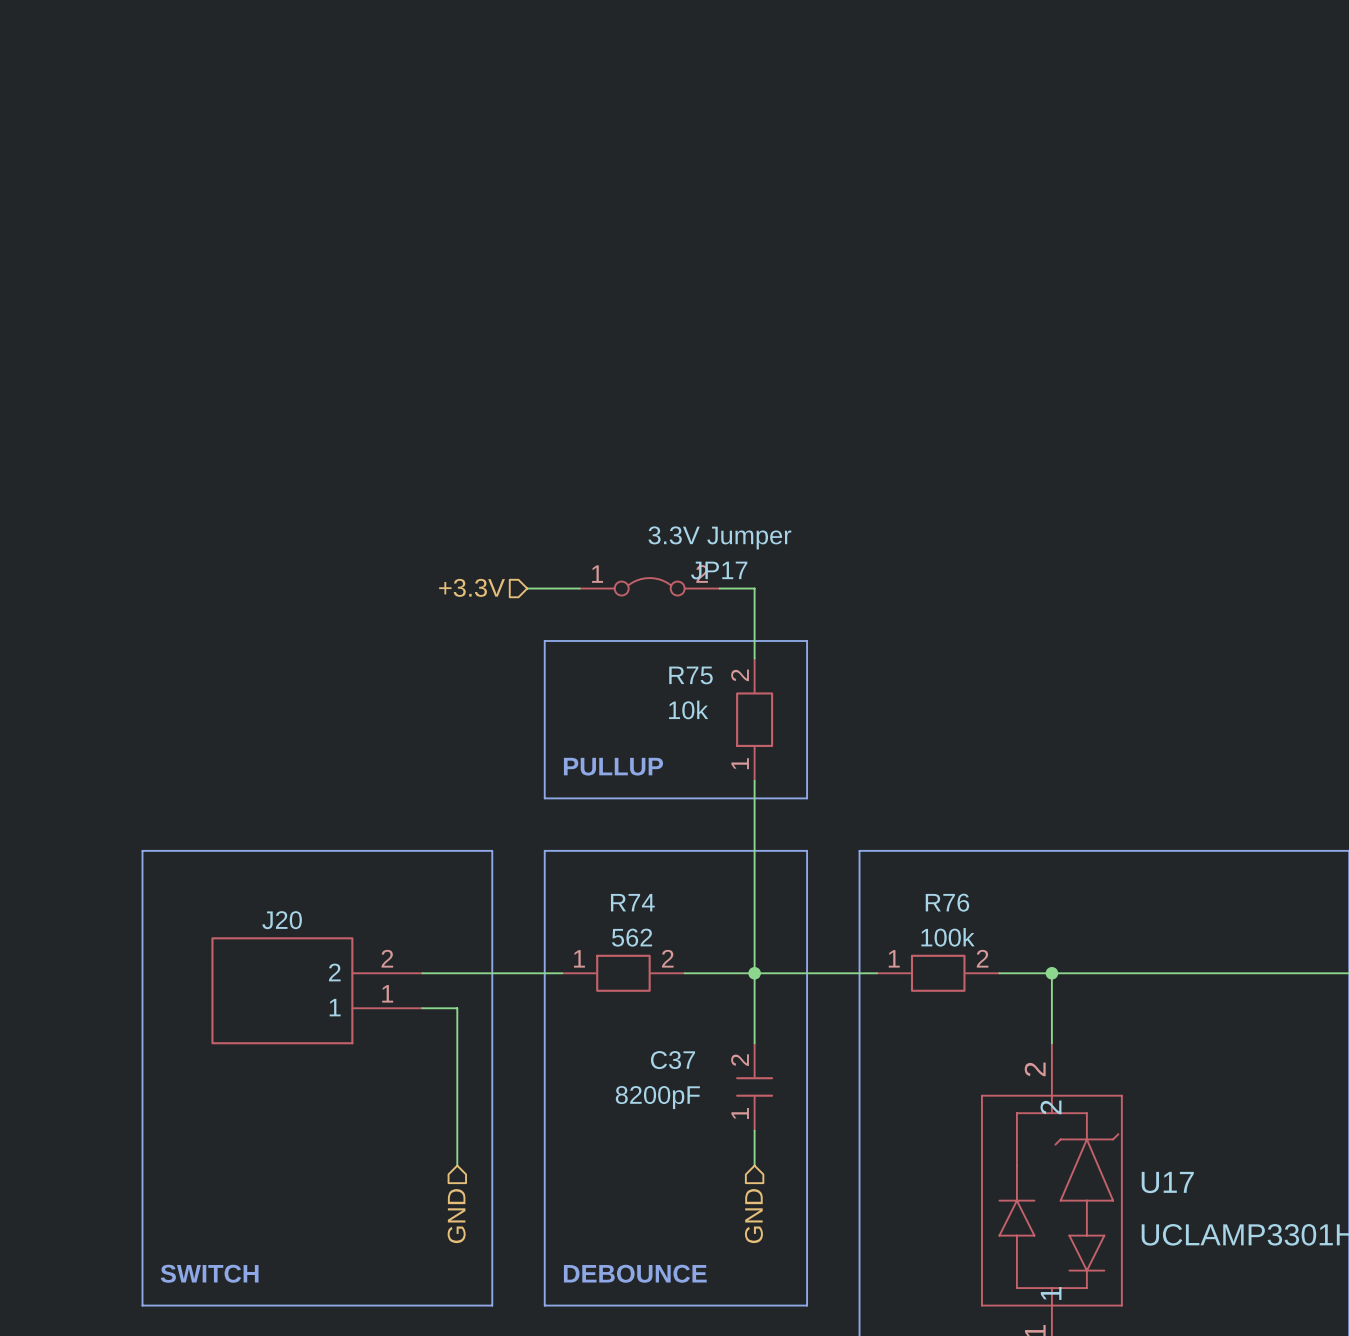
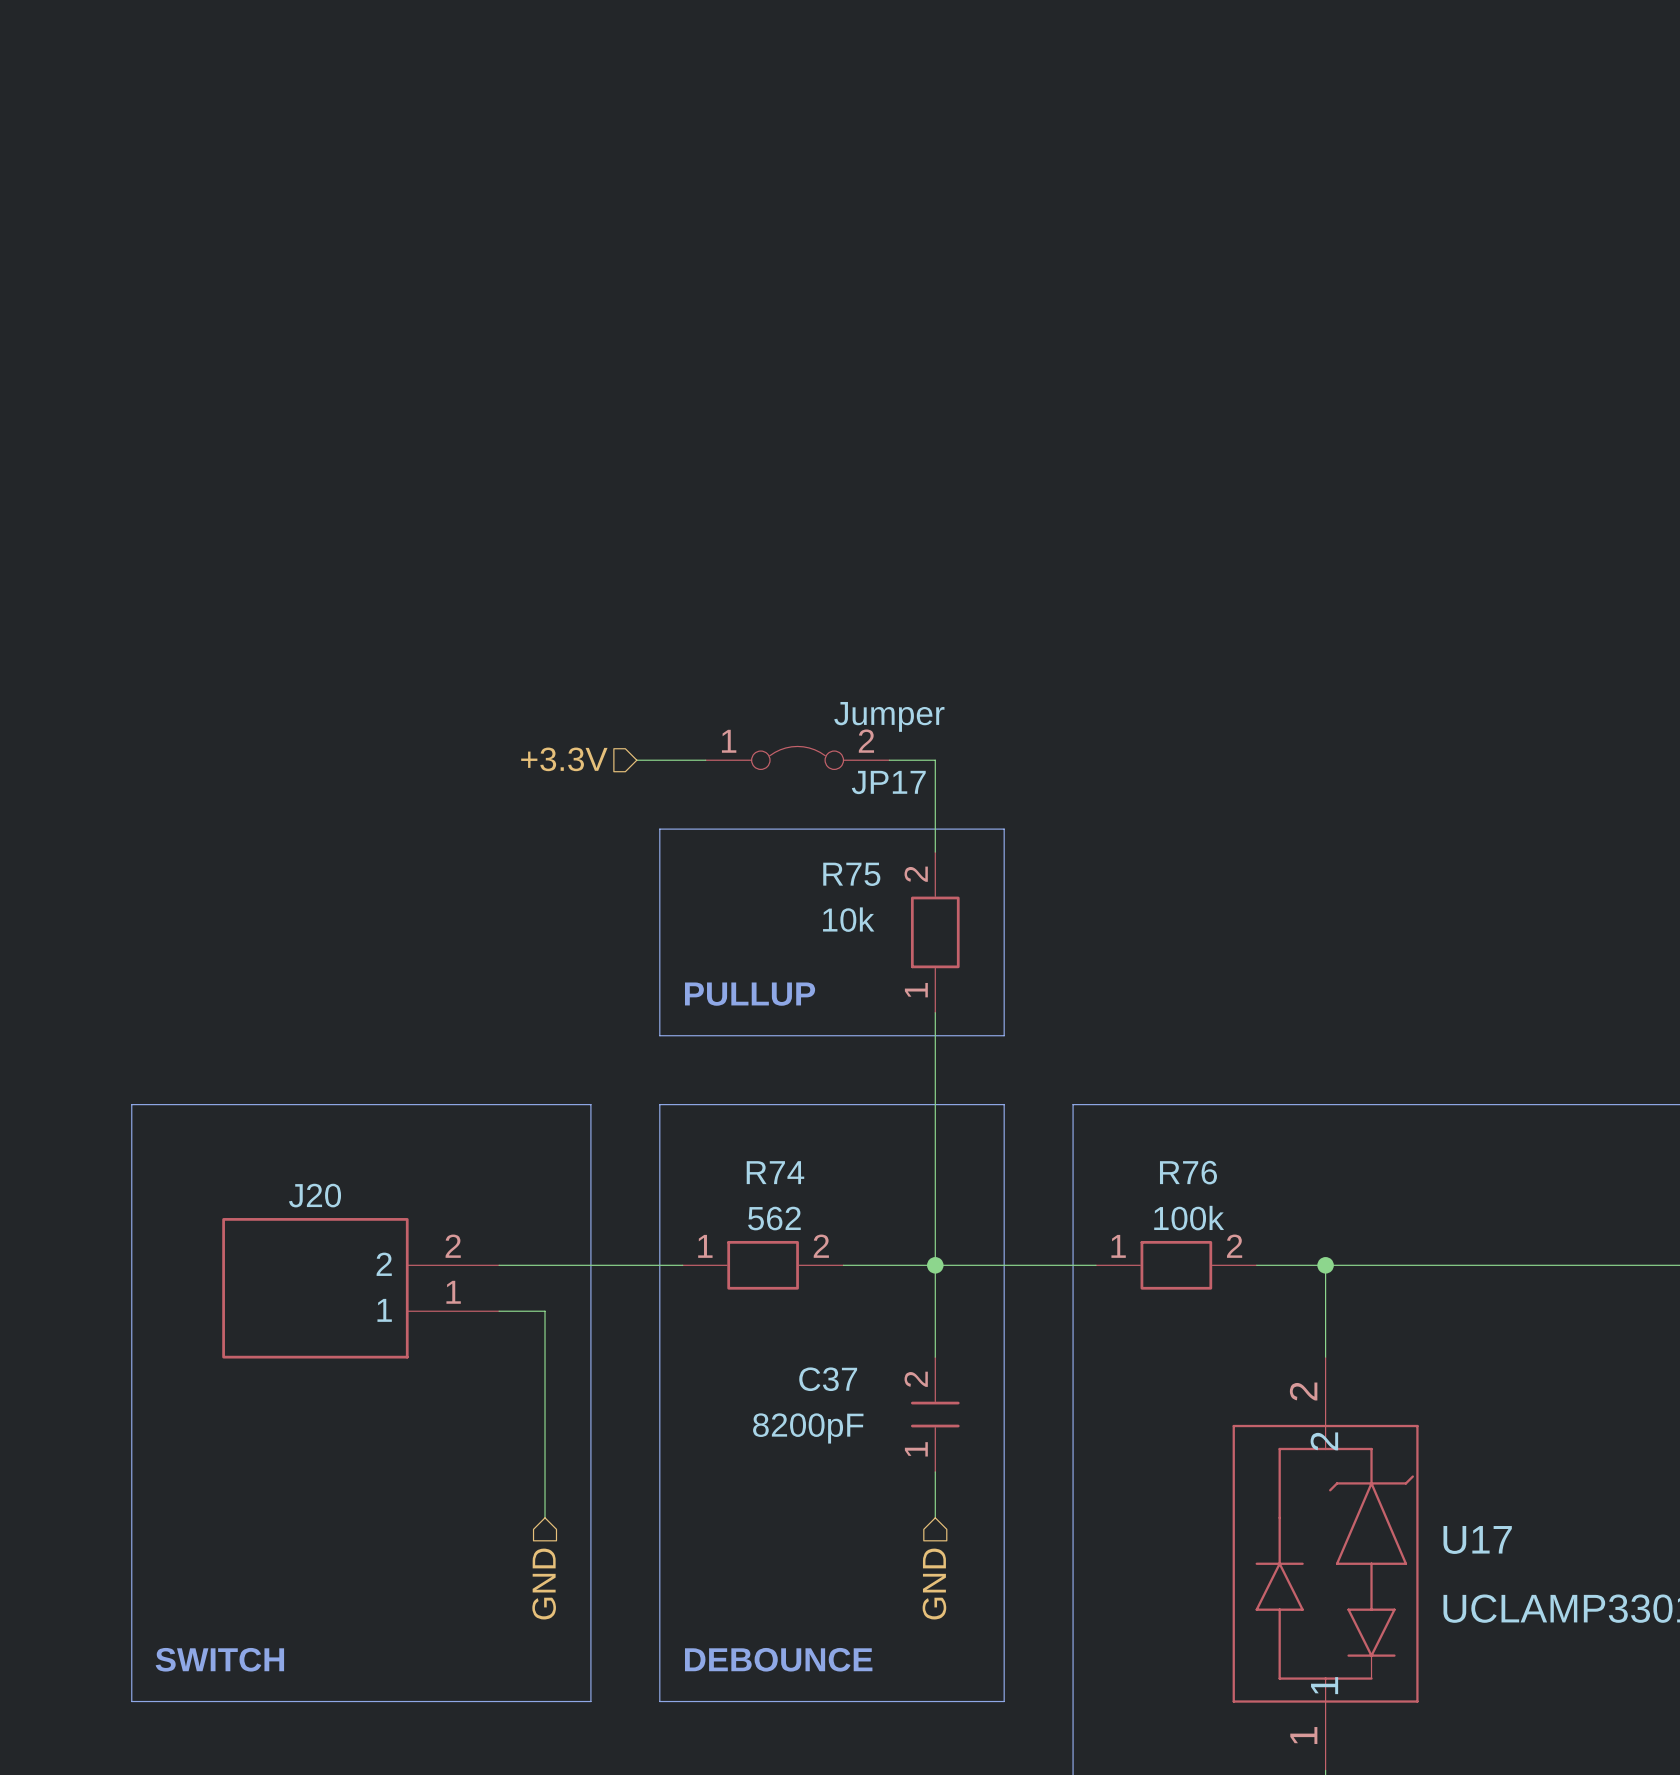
JP17 value: 3.3V Jumper (719, 537) -> Jumper (889, 716)
JP17 name position: JP17 (719, 570) -> JP17 (888, 782)

